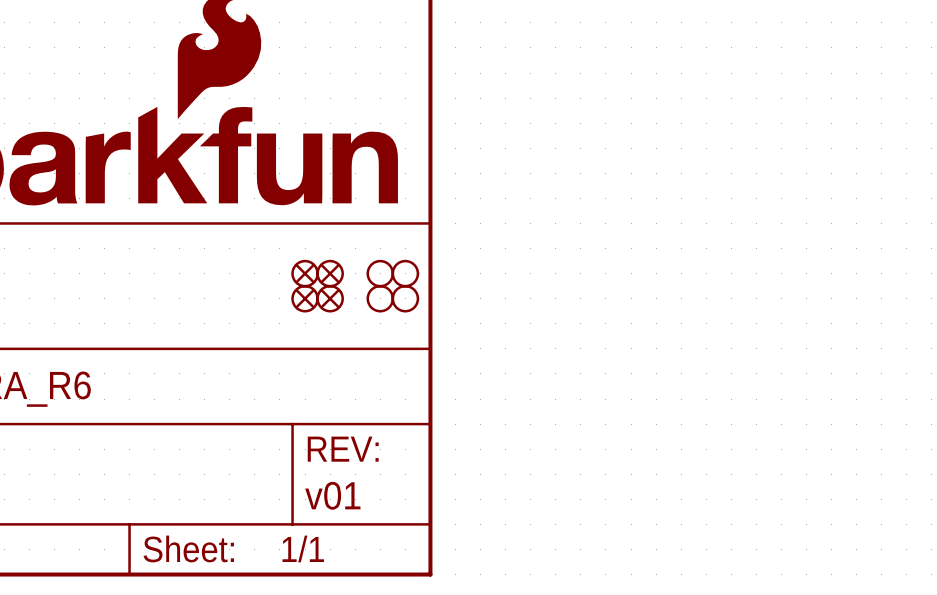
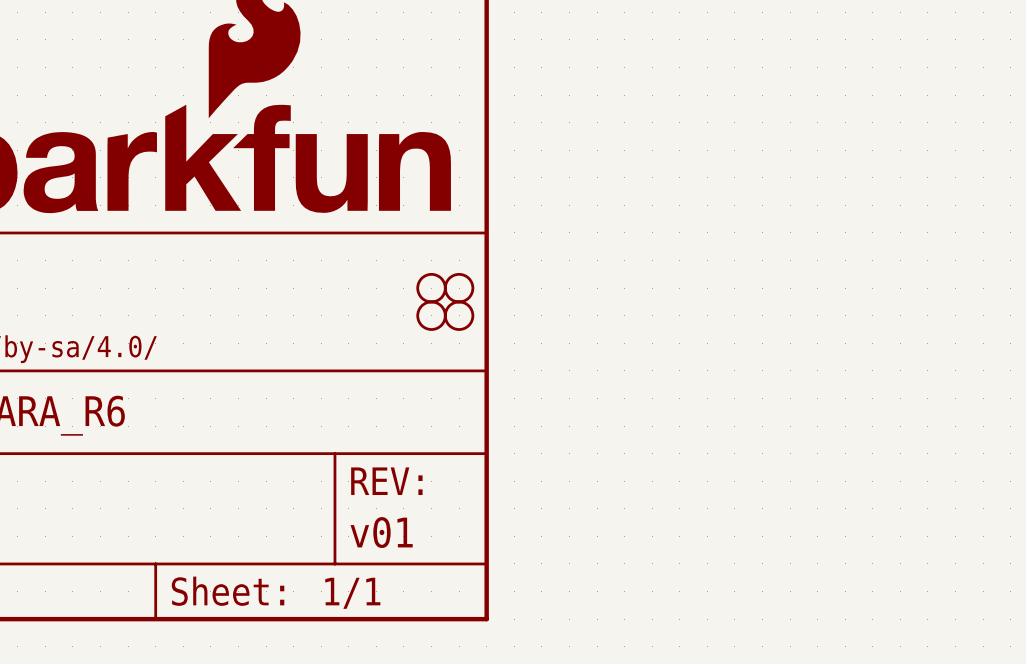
part: (305, 273) -> none
part: (330, 273) -> none
part: (305, 298) -> none
part: (330, 298) -> none

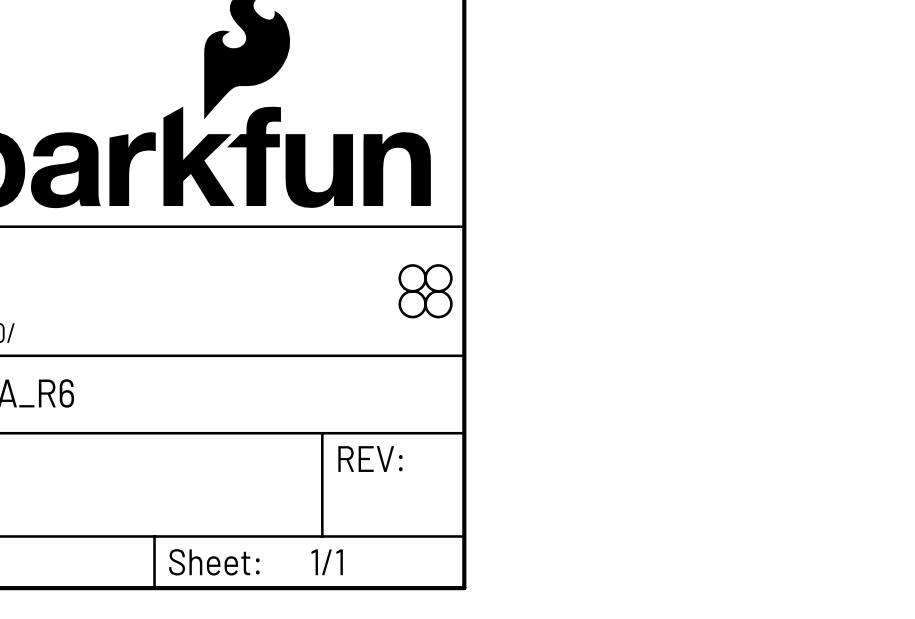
part text: v01 (381, 532) -> none

